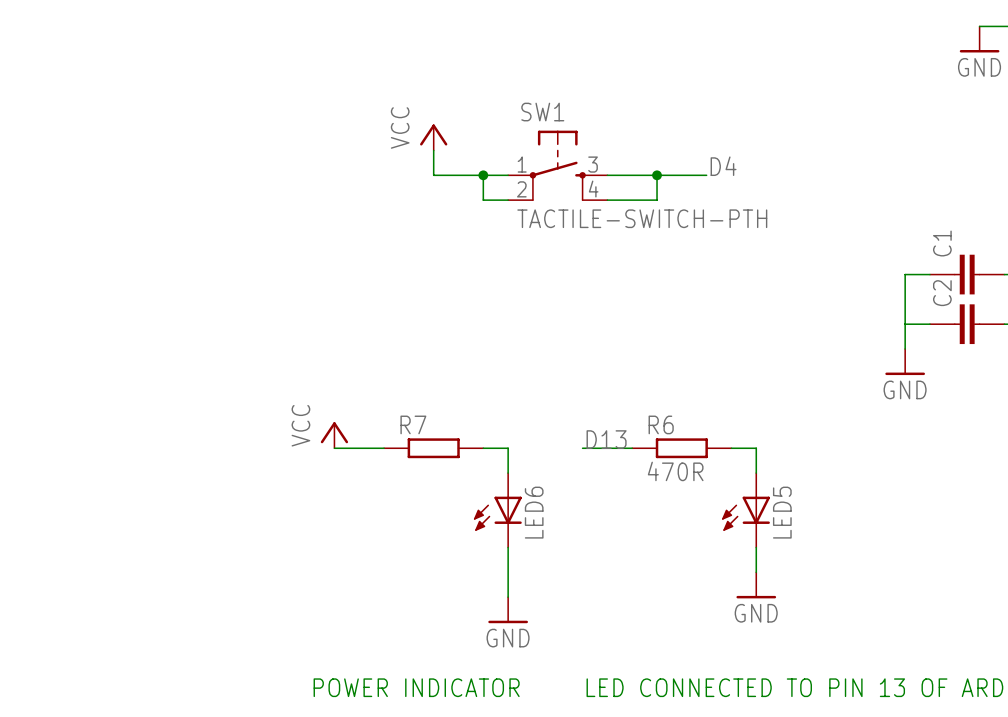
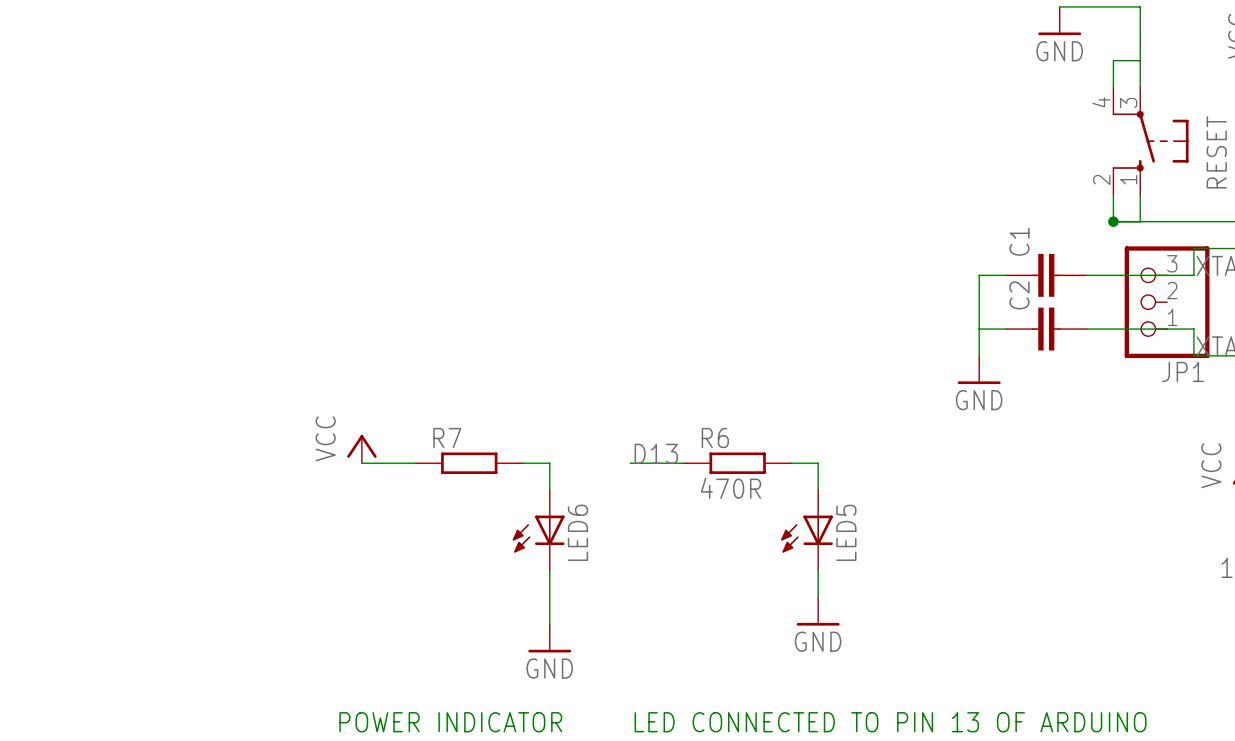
power symbol: VCC (433, 137) -> none
wire: (433, 150) (433, 175) (508, 175) -> none
SW1: TACTILE-SWITCH-PTH (557, 165) -> none
label: D4 (723, 166) -> none
wire: (483, 175) (483, 200) (508, 200) -> none
junction: (483, 175) -> none
wire: (607, 175) (706, 175) -> none
wire: (657, 175) (657, 200) (607, 200) -> none
junction: (657, 175) -> none

